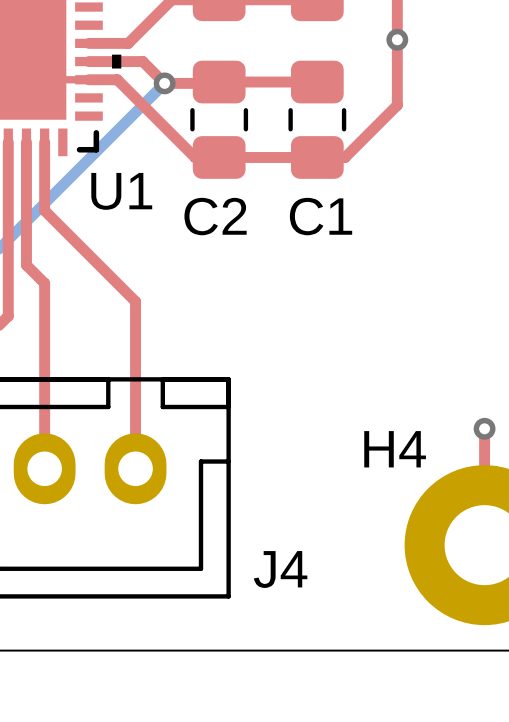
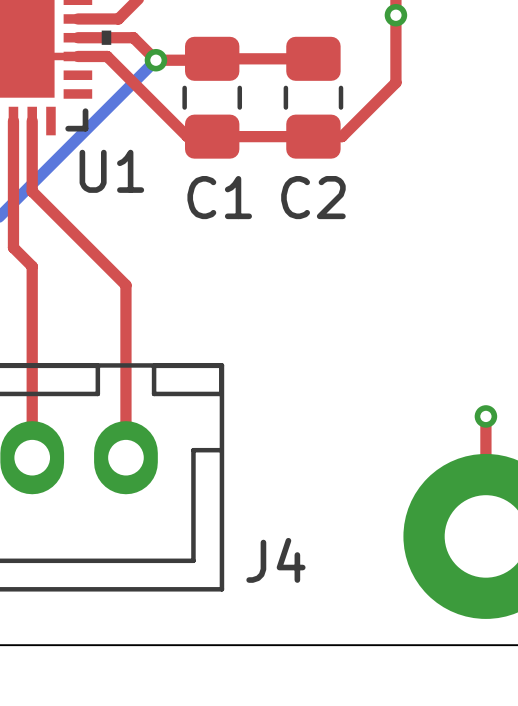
C2 name position: C2 (215, 216) -> C2 (313, 197)
C1 name position: C1 (321, 216) -> C1 (219, 197)
H4 name: H4 (395, 449) -> none

